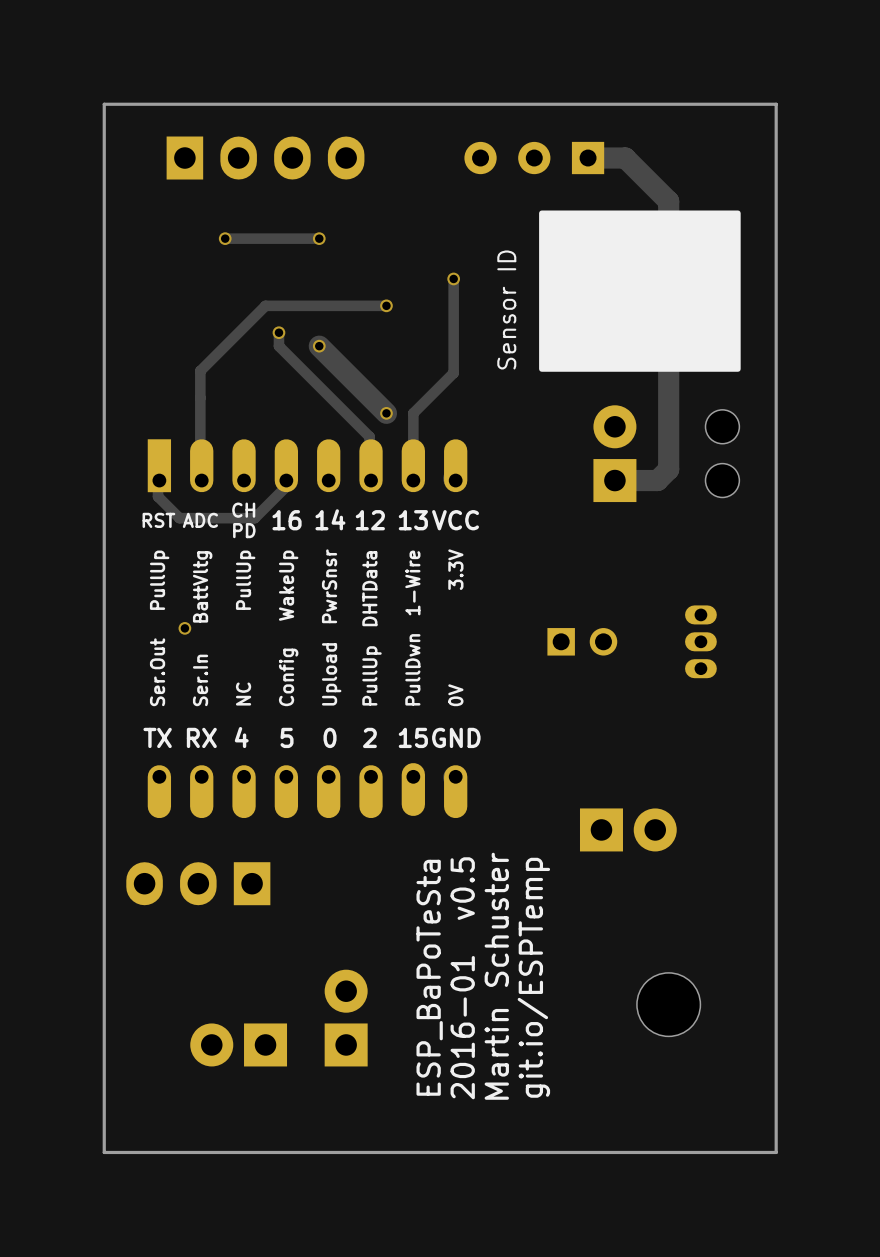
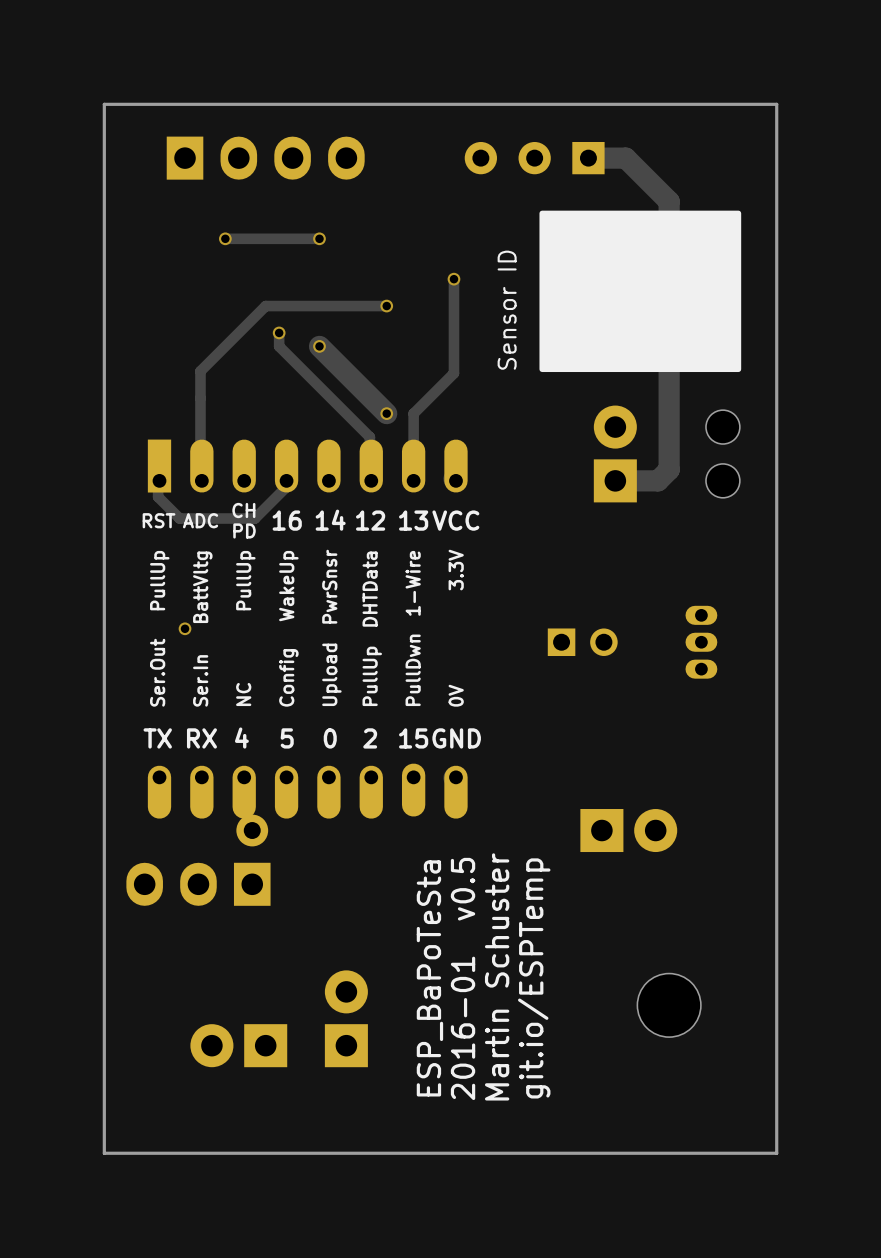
part: none -> (252, 830)

